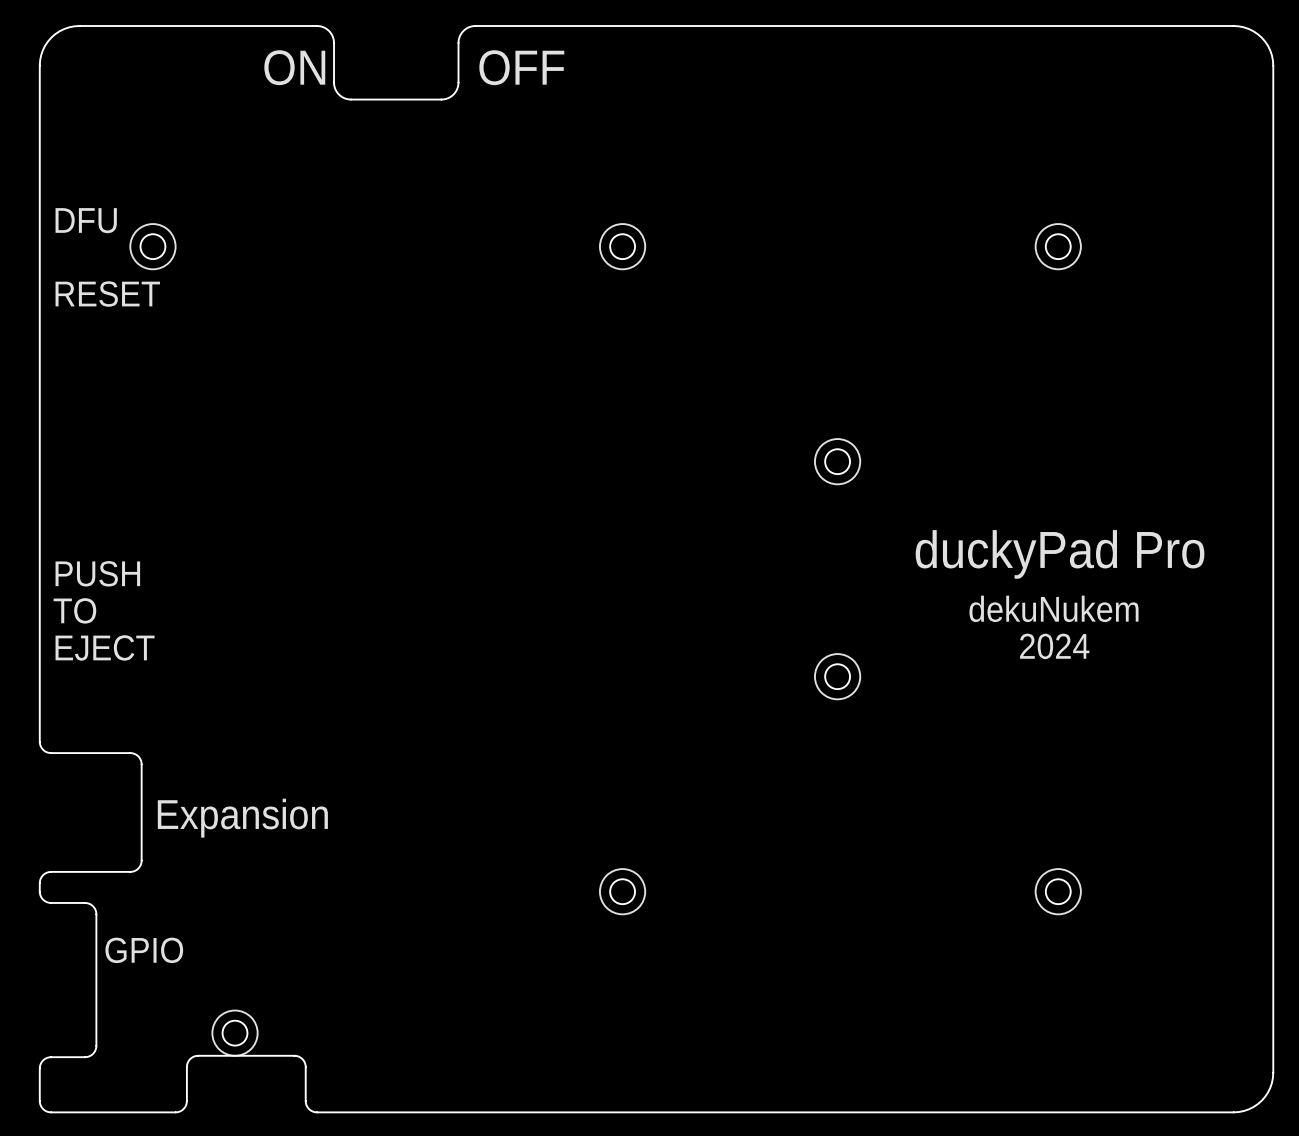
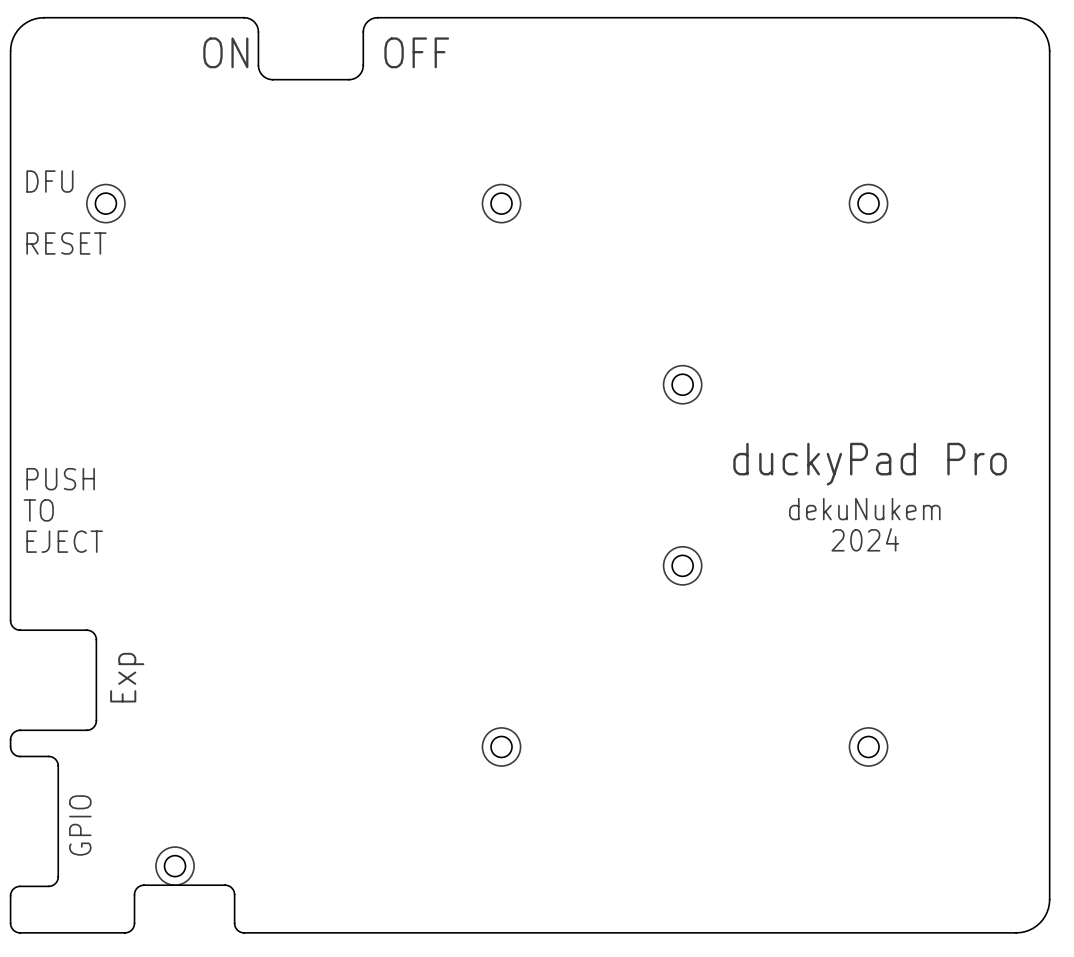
text: none -> Exp (127, 677)
text: Expansion (242, 818) -> none
text rotation: 0° (144, 950) -> 90° counterclockwise (80, 825)

